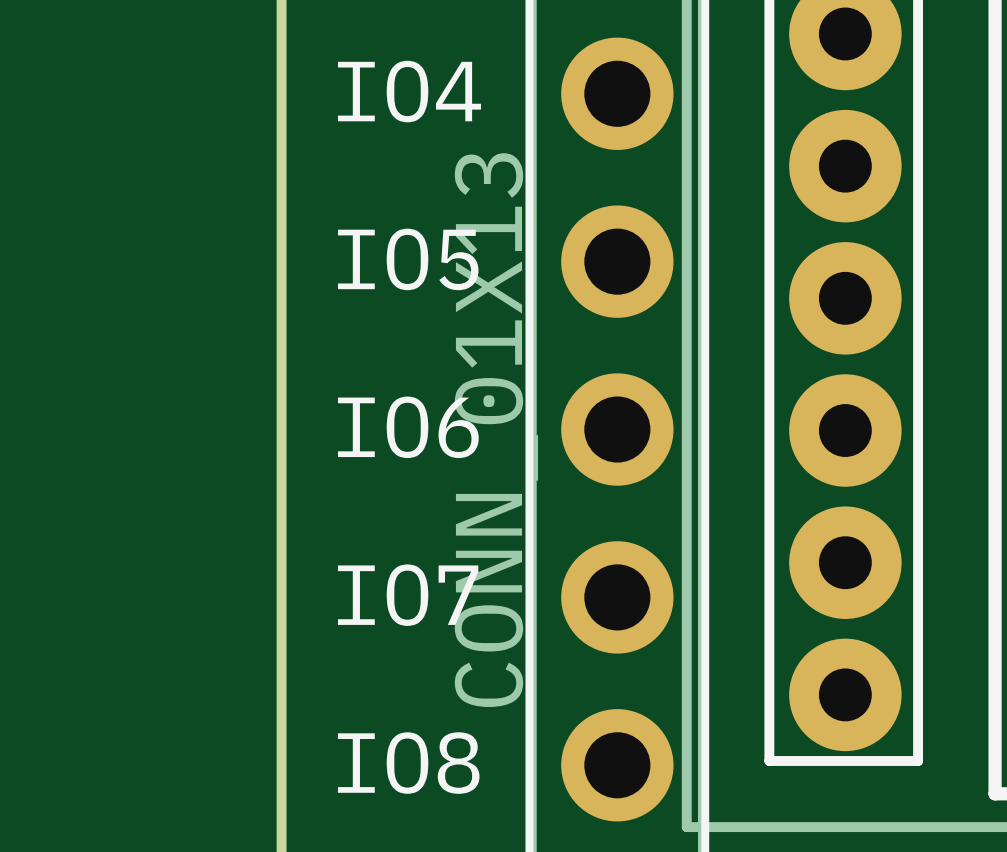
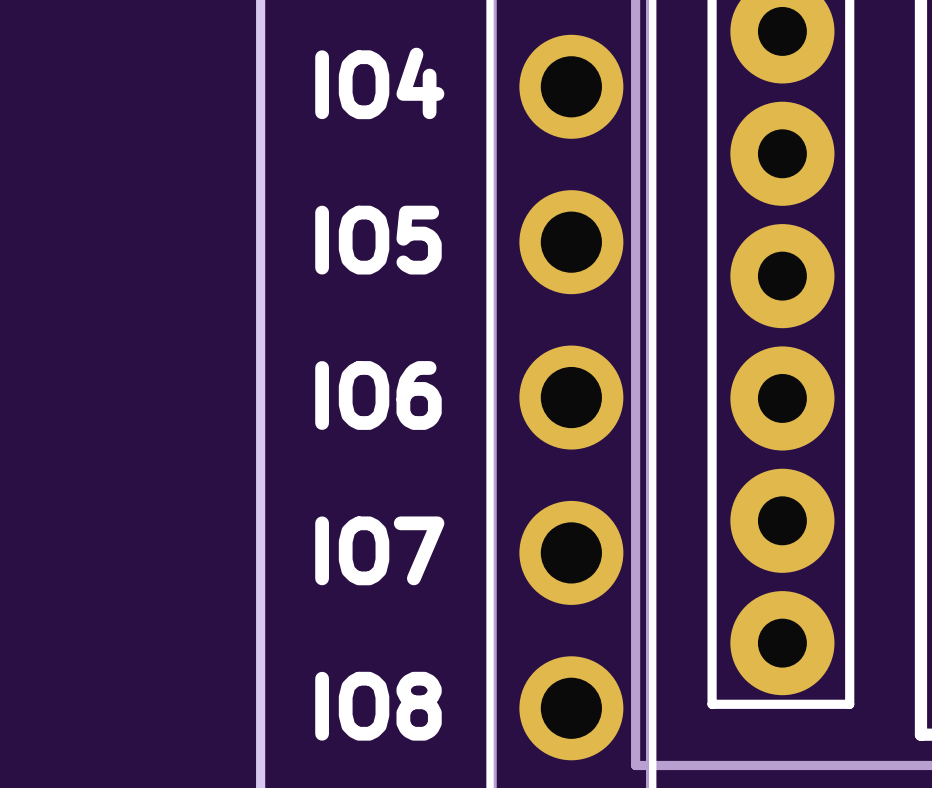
part value: CONN_01X13 (496, 430) -> none

